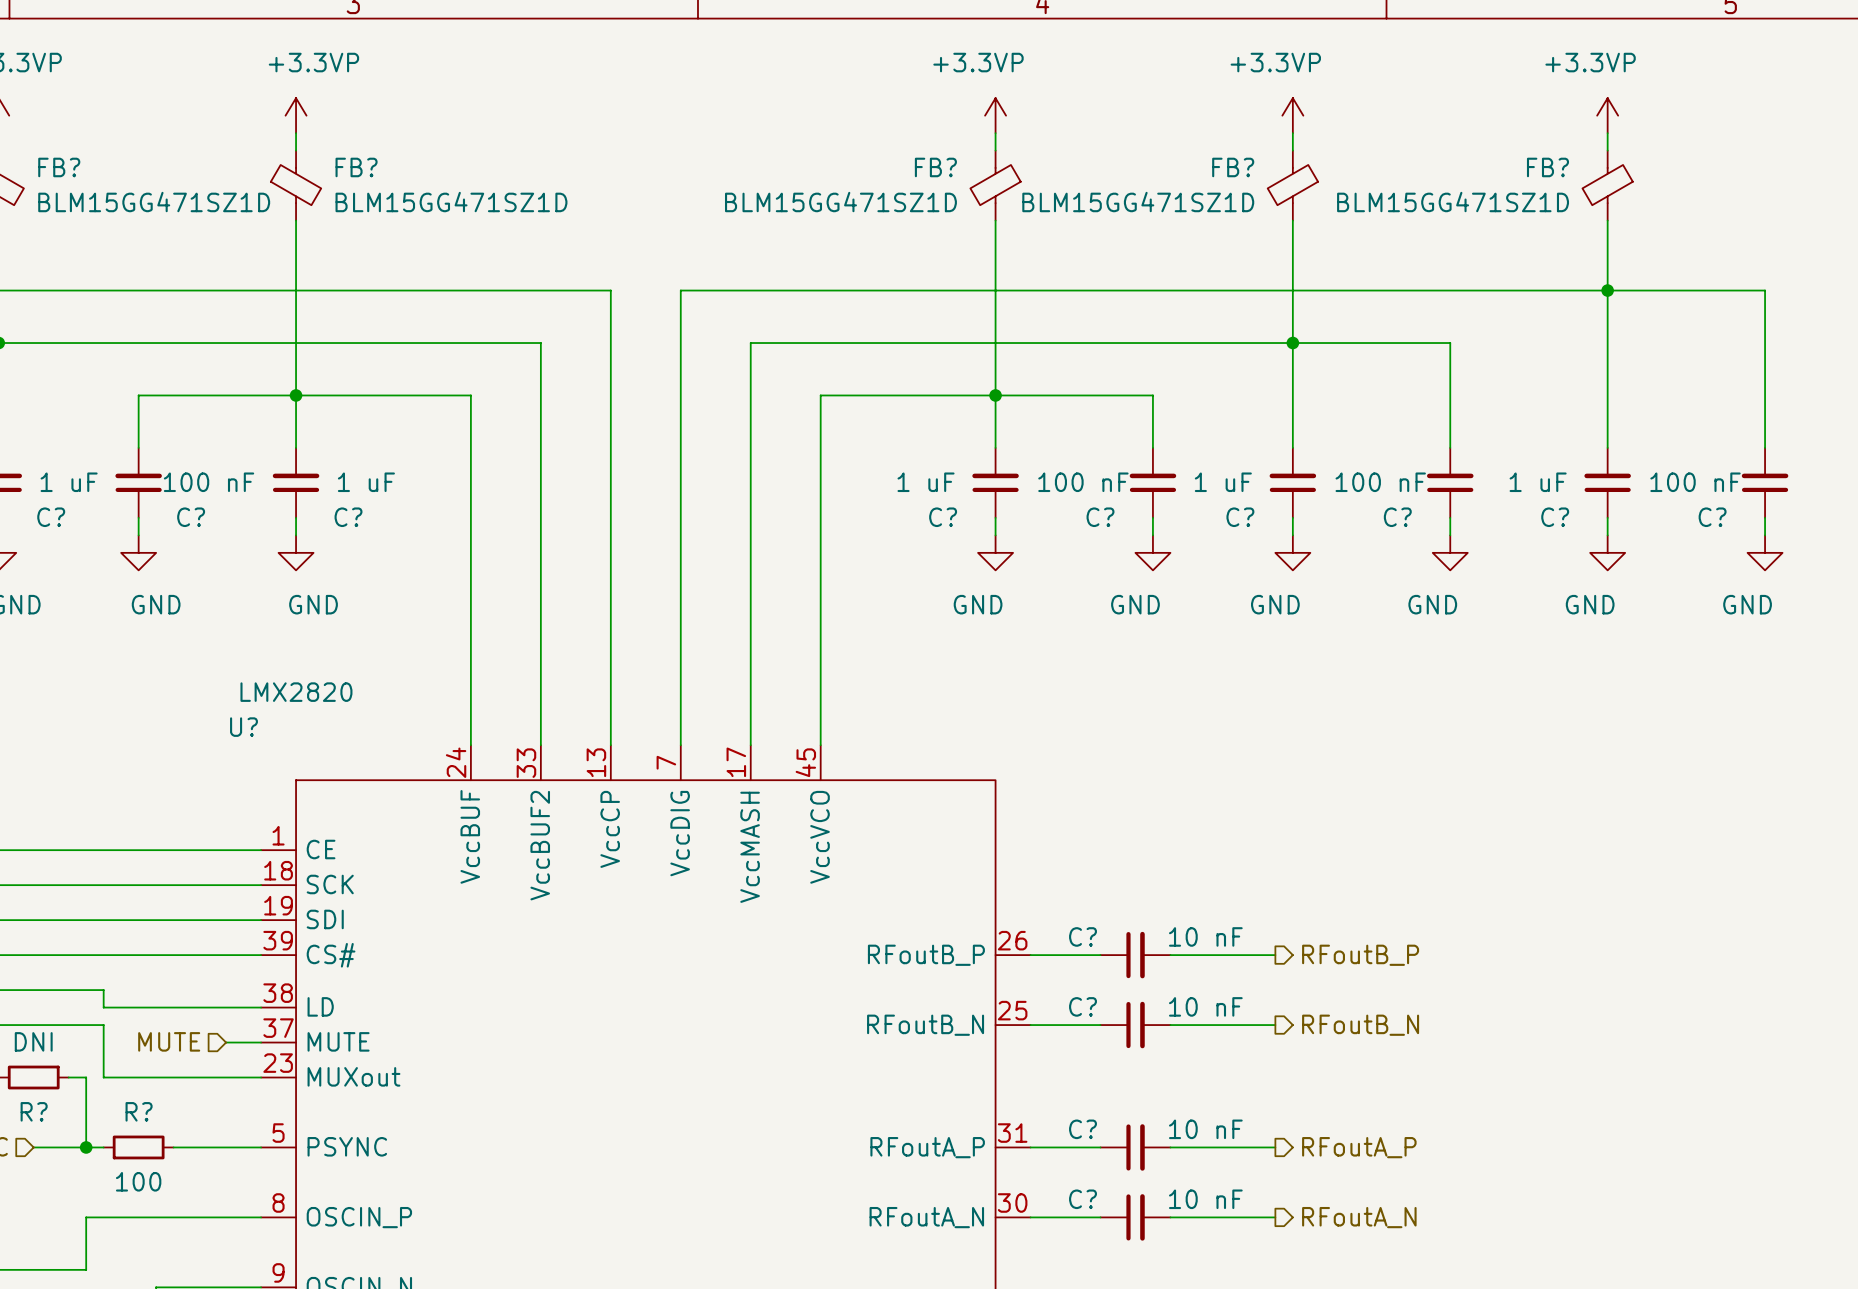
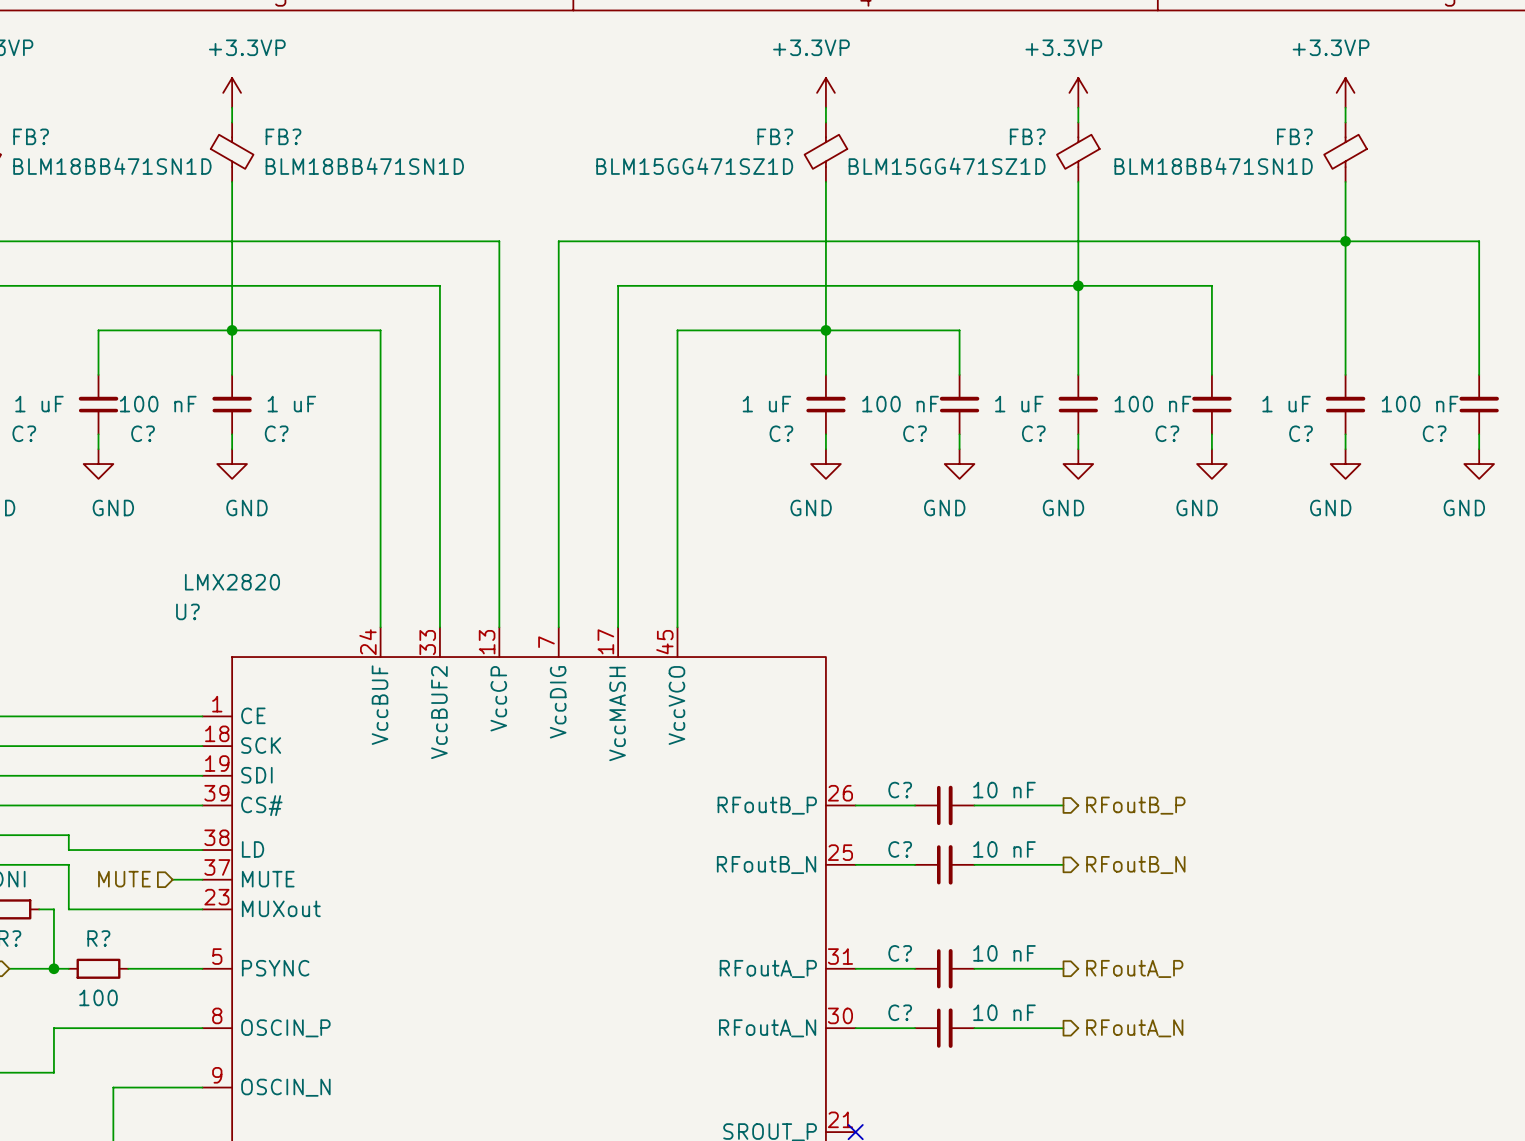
FB? value: BLM15GG471SZ1D (154, 202) -> BLM18BB471SN1D (112, 166)
FB? value: BLM15GG471SZ1D (451, 202) -> BLM18BB471SN1D (364, 166)
FB? value: BLM15GG471SZ1D (1453, 202) -> BLM18BB471SN1D (1213, 166)

